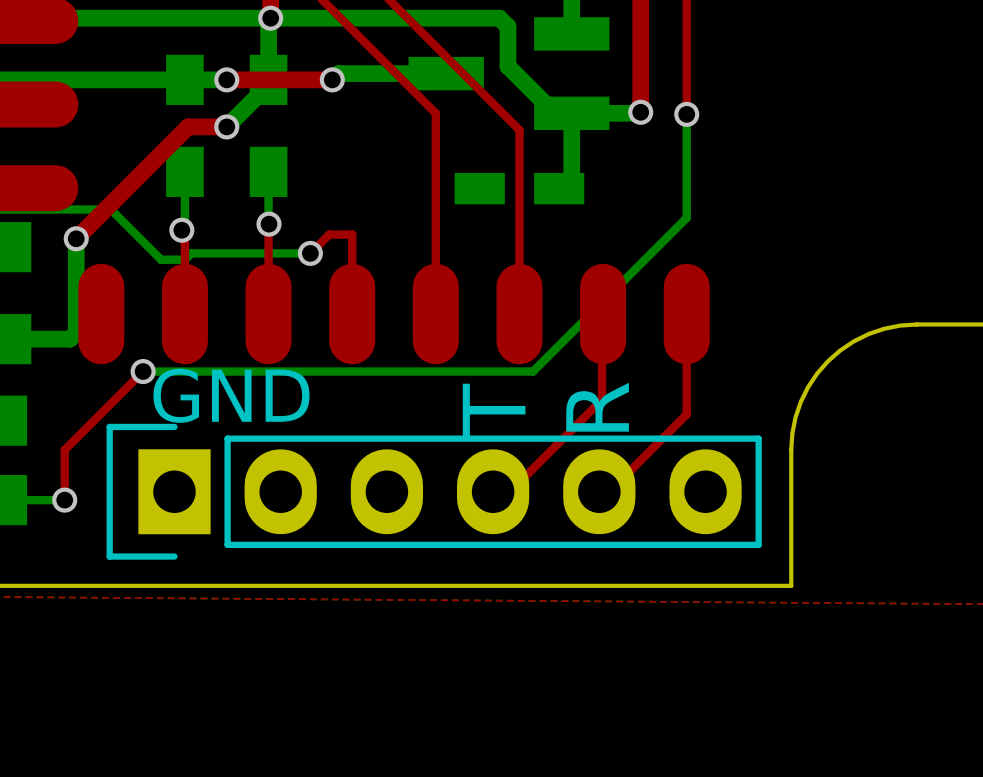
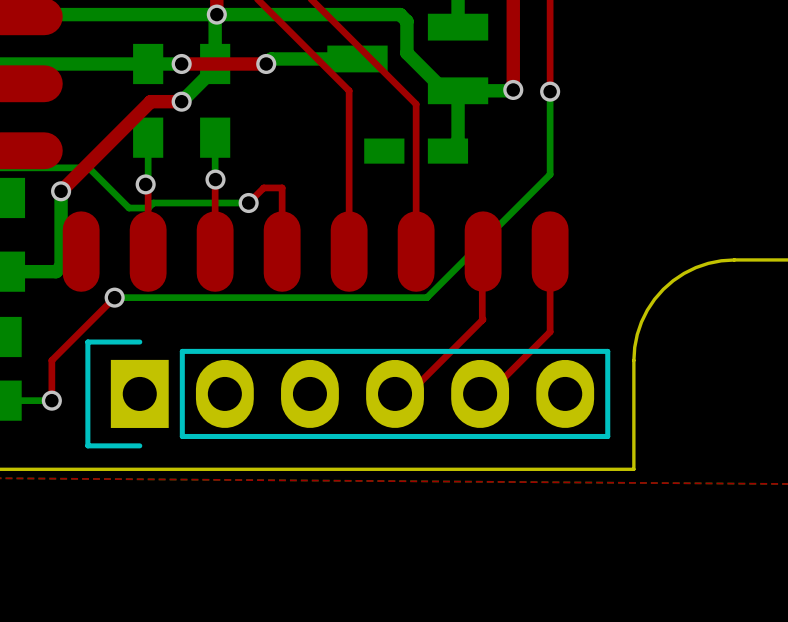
text: GND (231, 395) -> none
text: R (597, 407) -> none
text: T (494, 410) -> none

